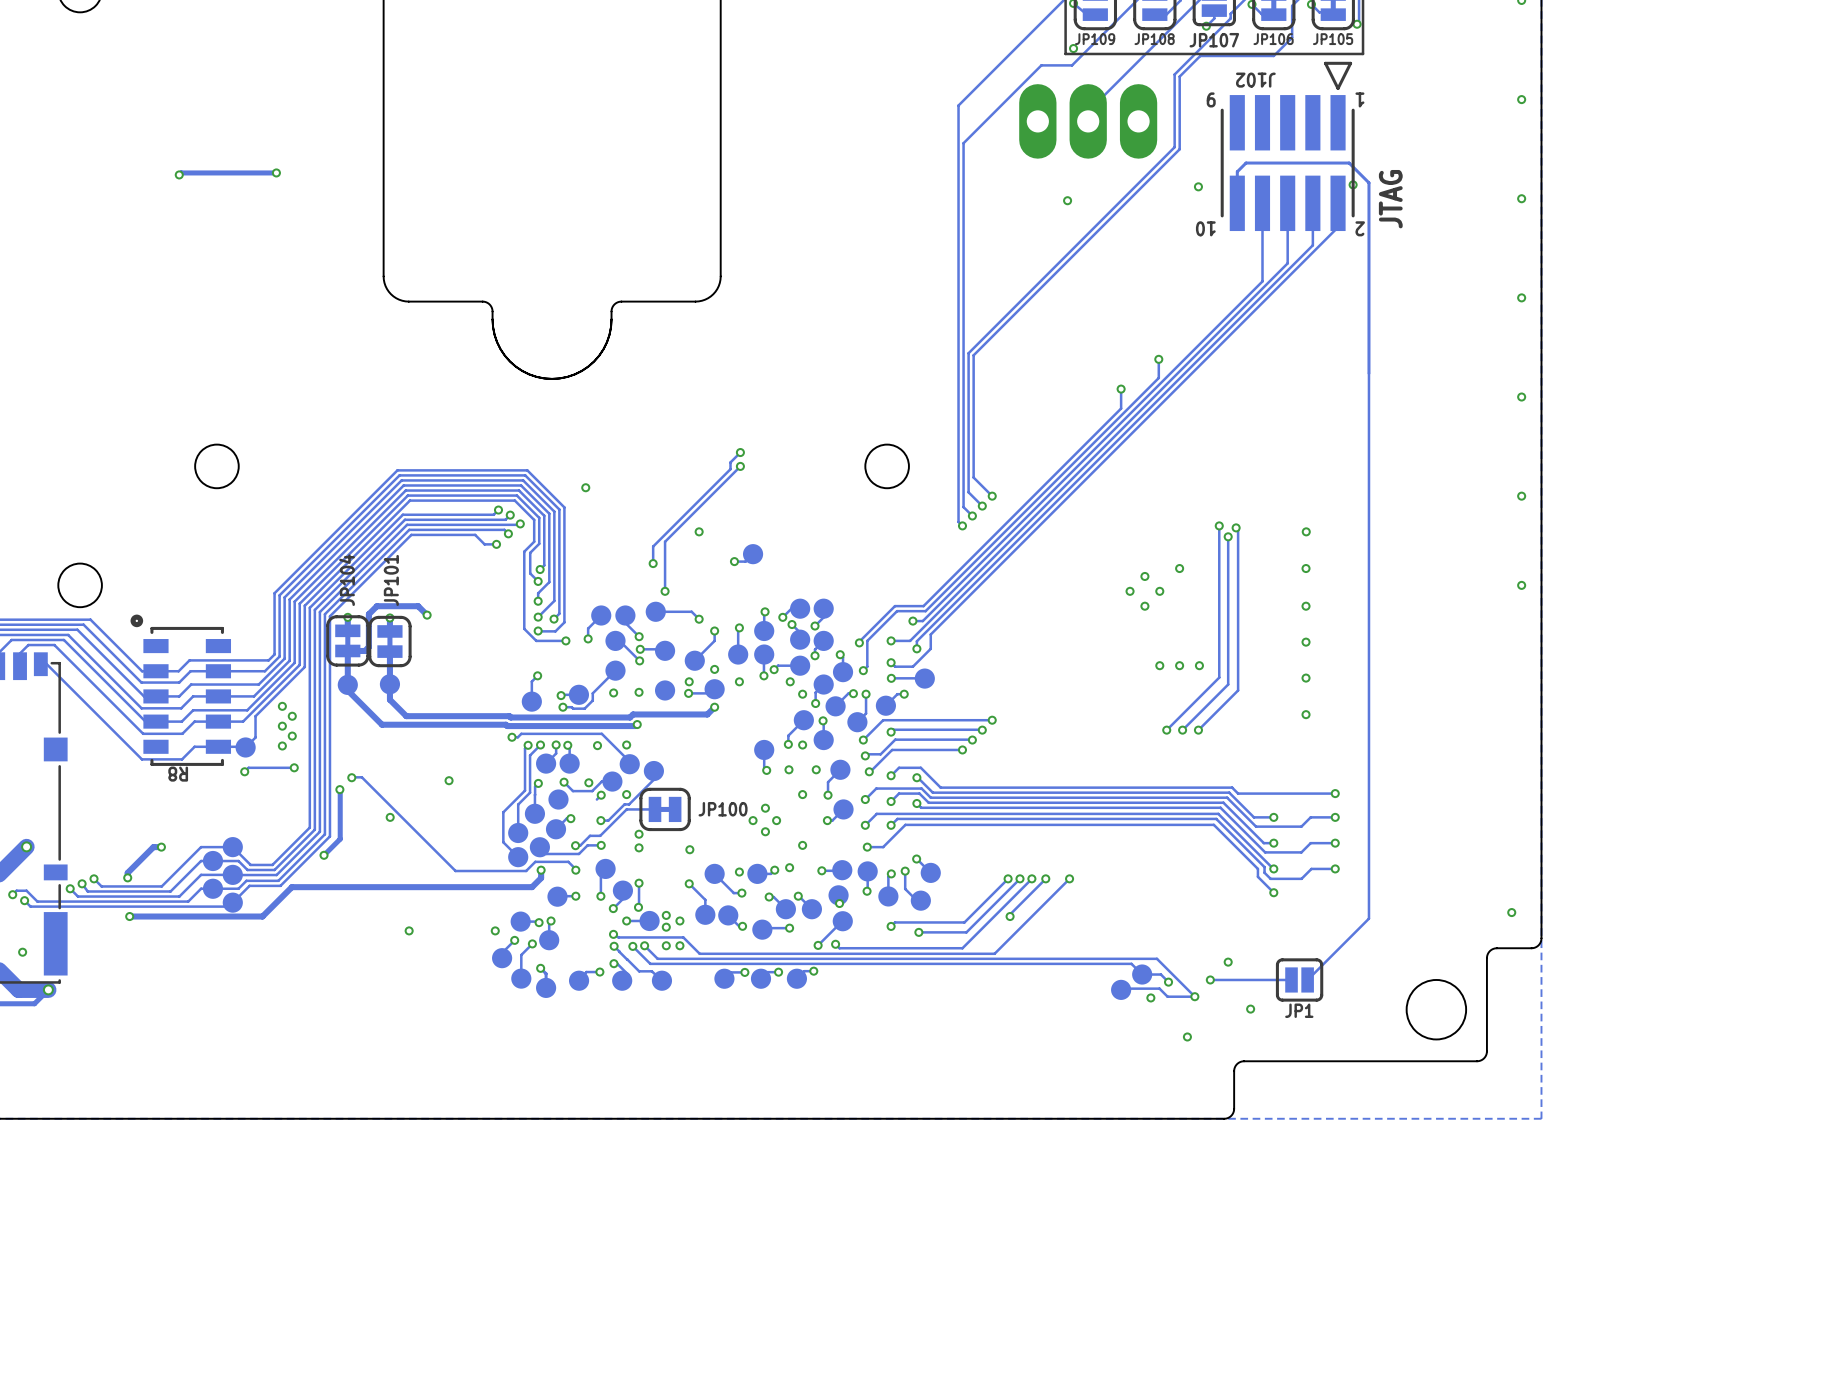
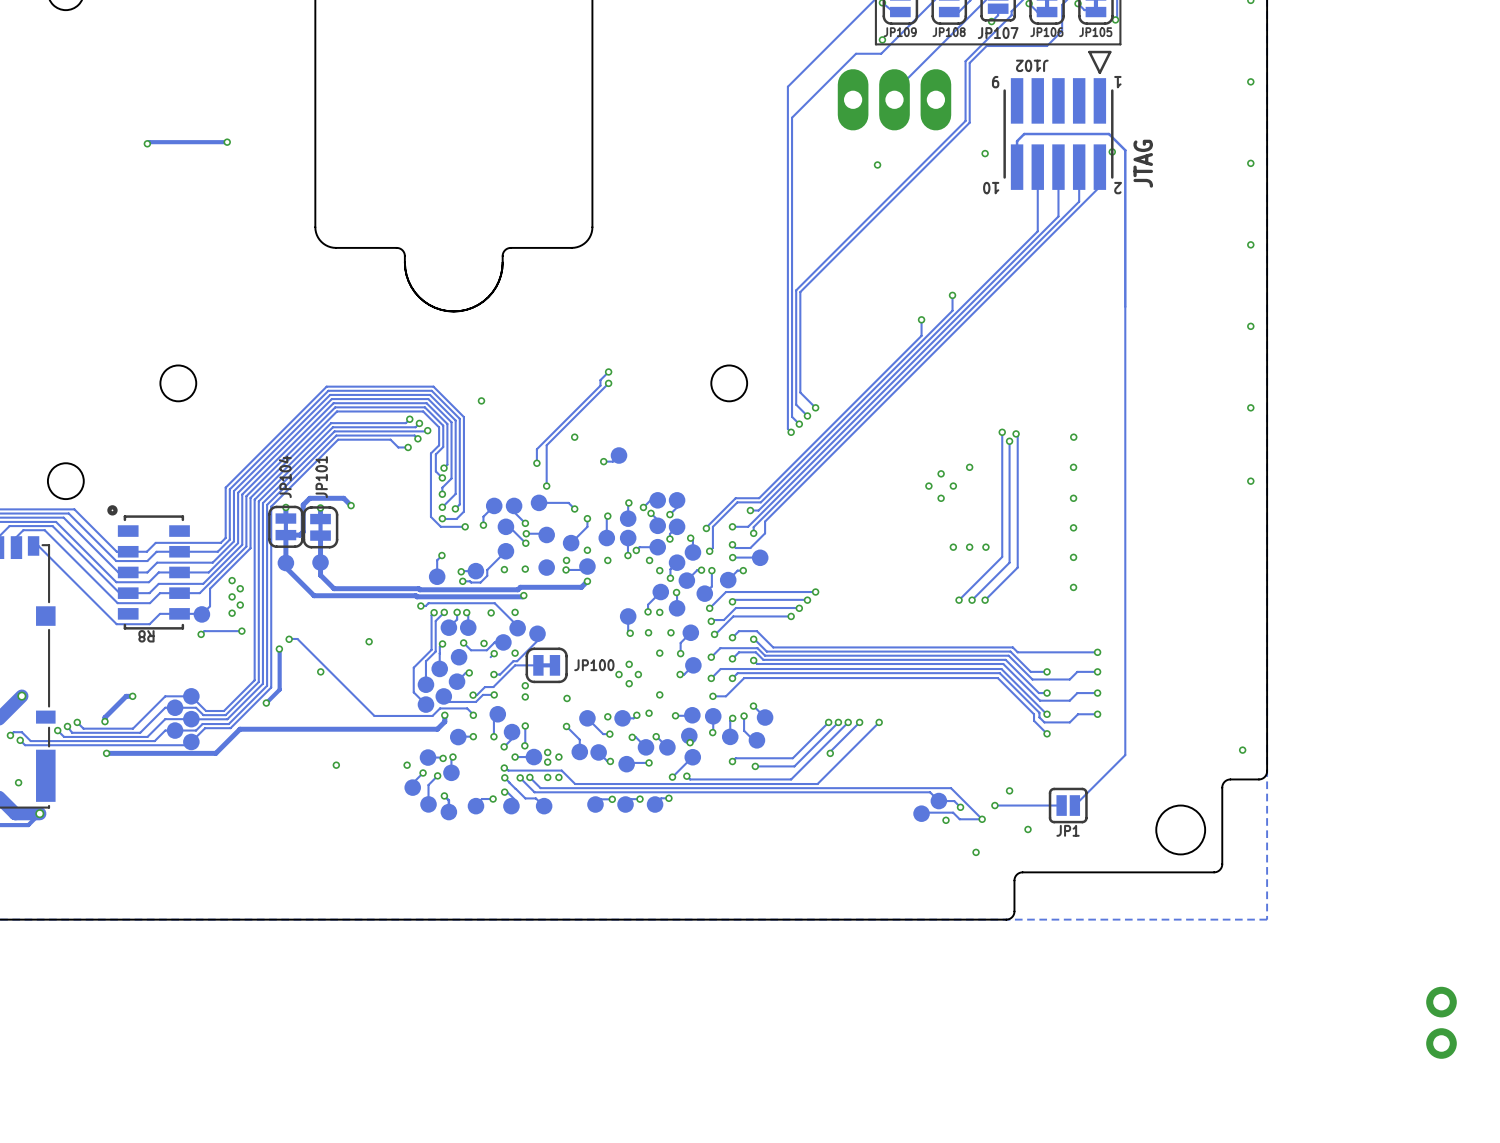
part: none -> (1441, 1022)

